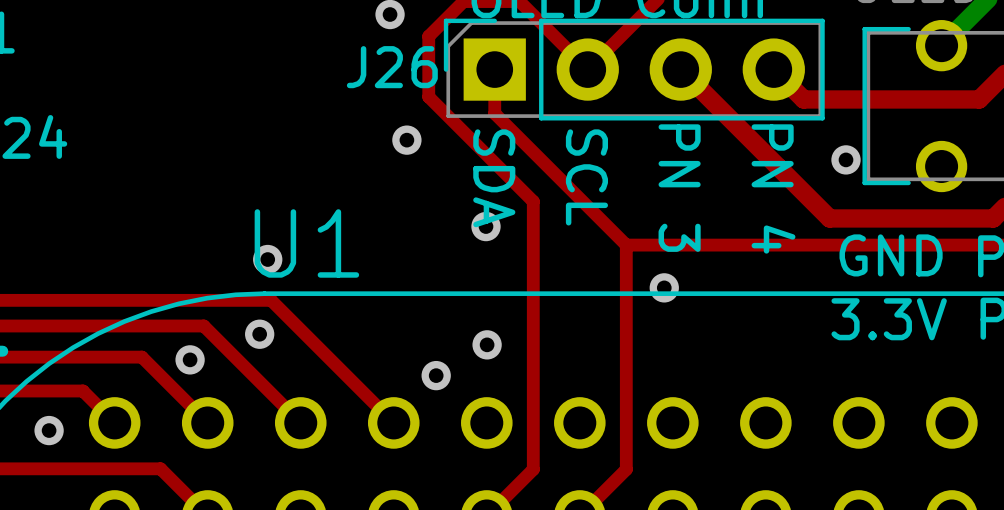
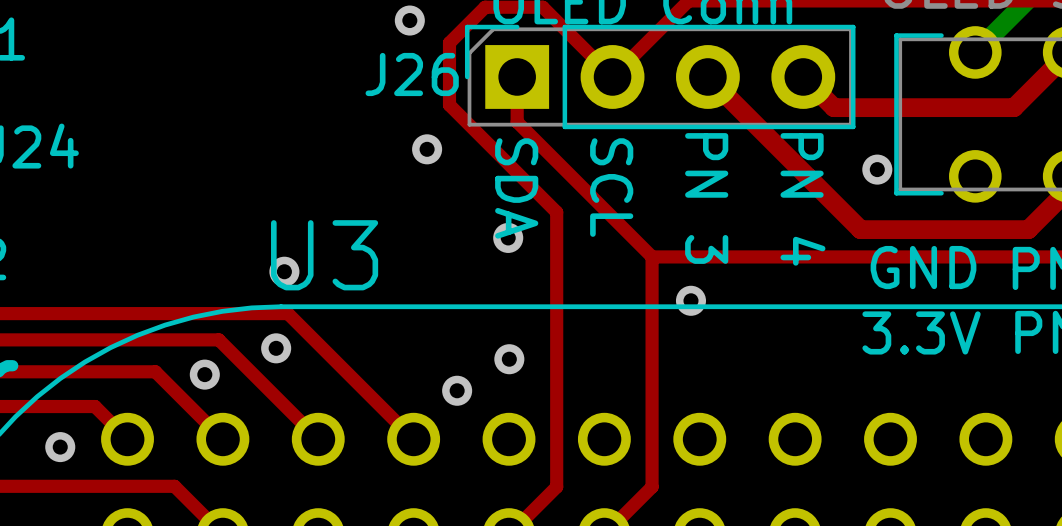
U1 name: U1 (306, 243) -> U3 (324, 255)

